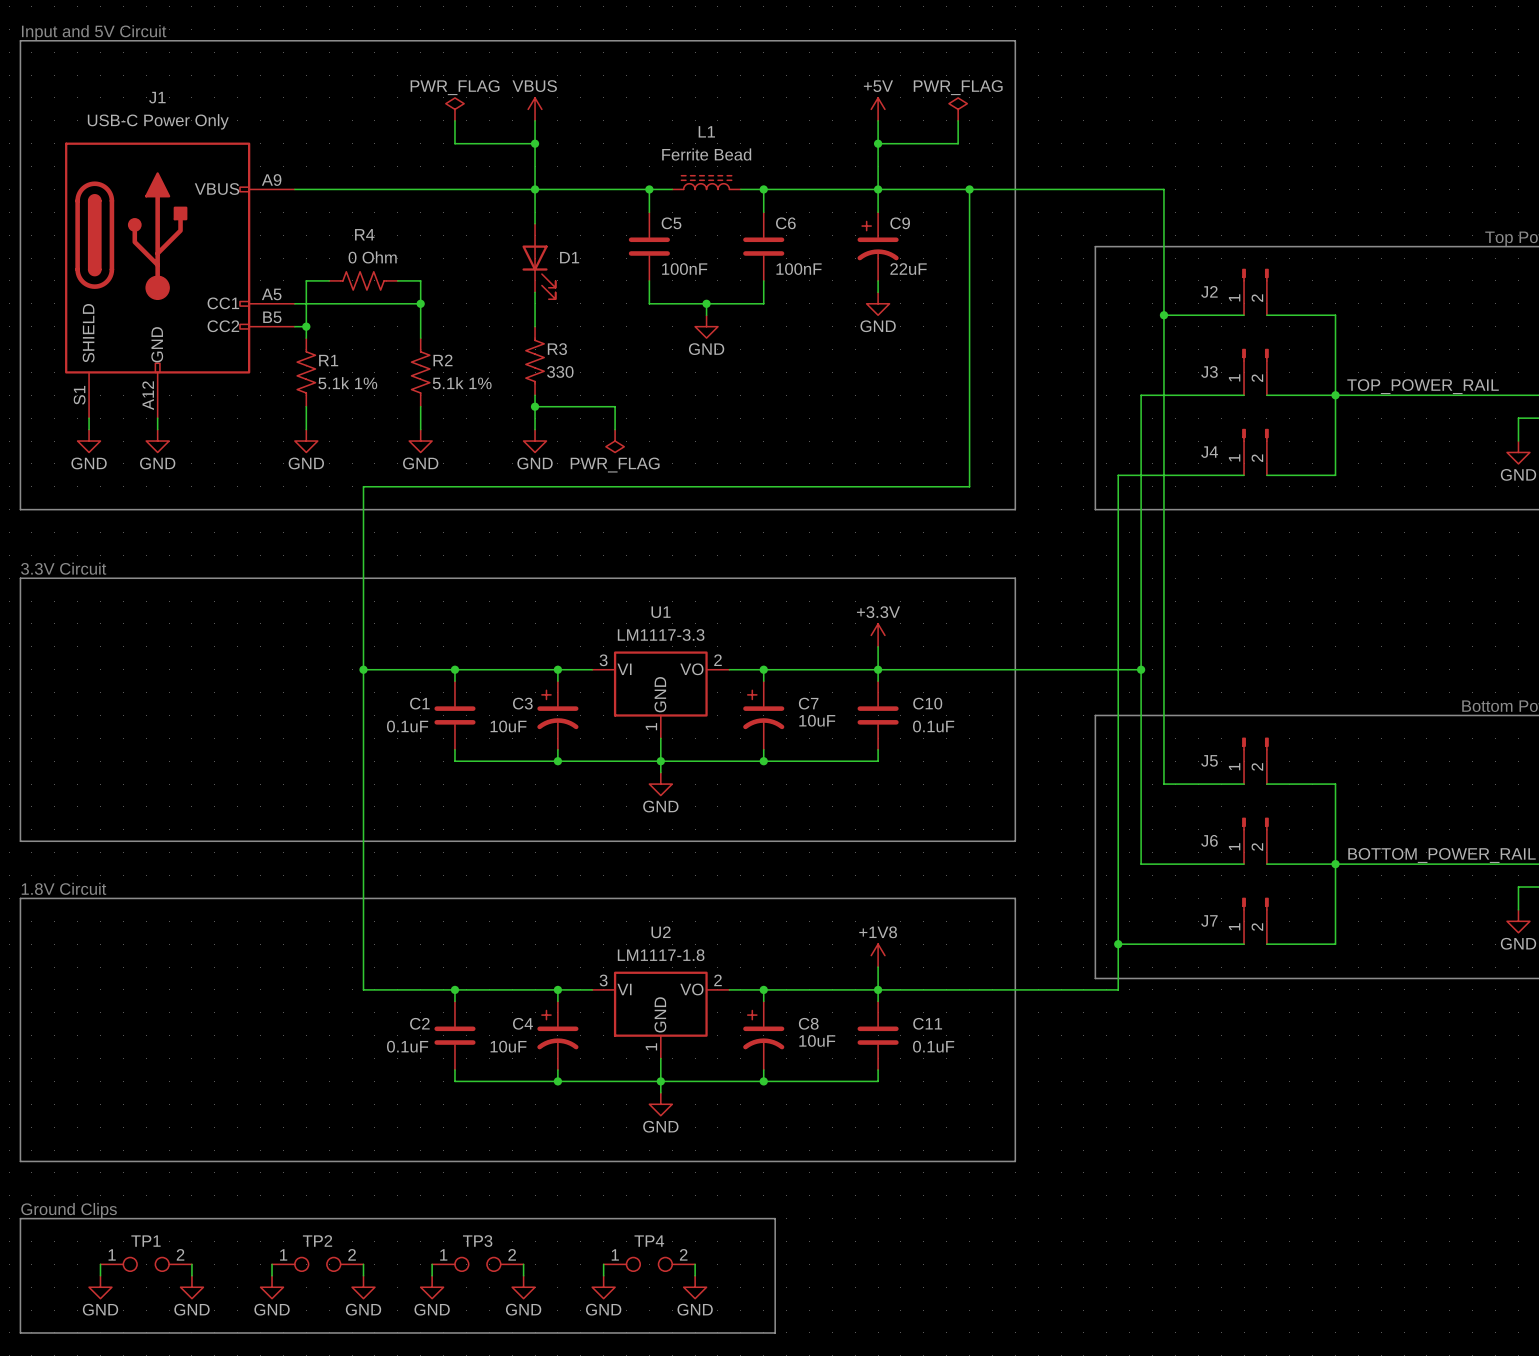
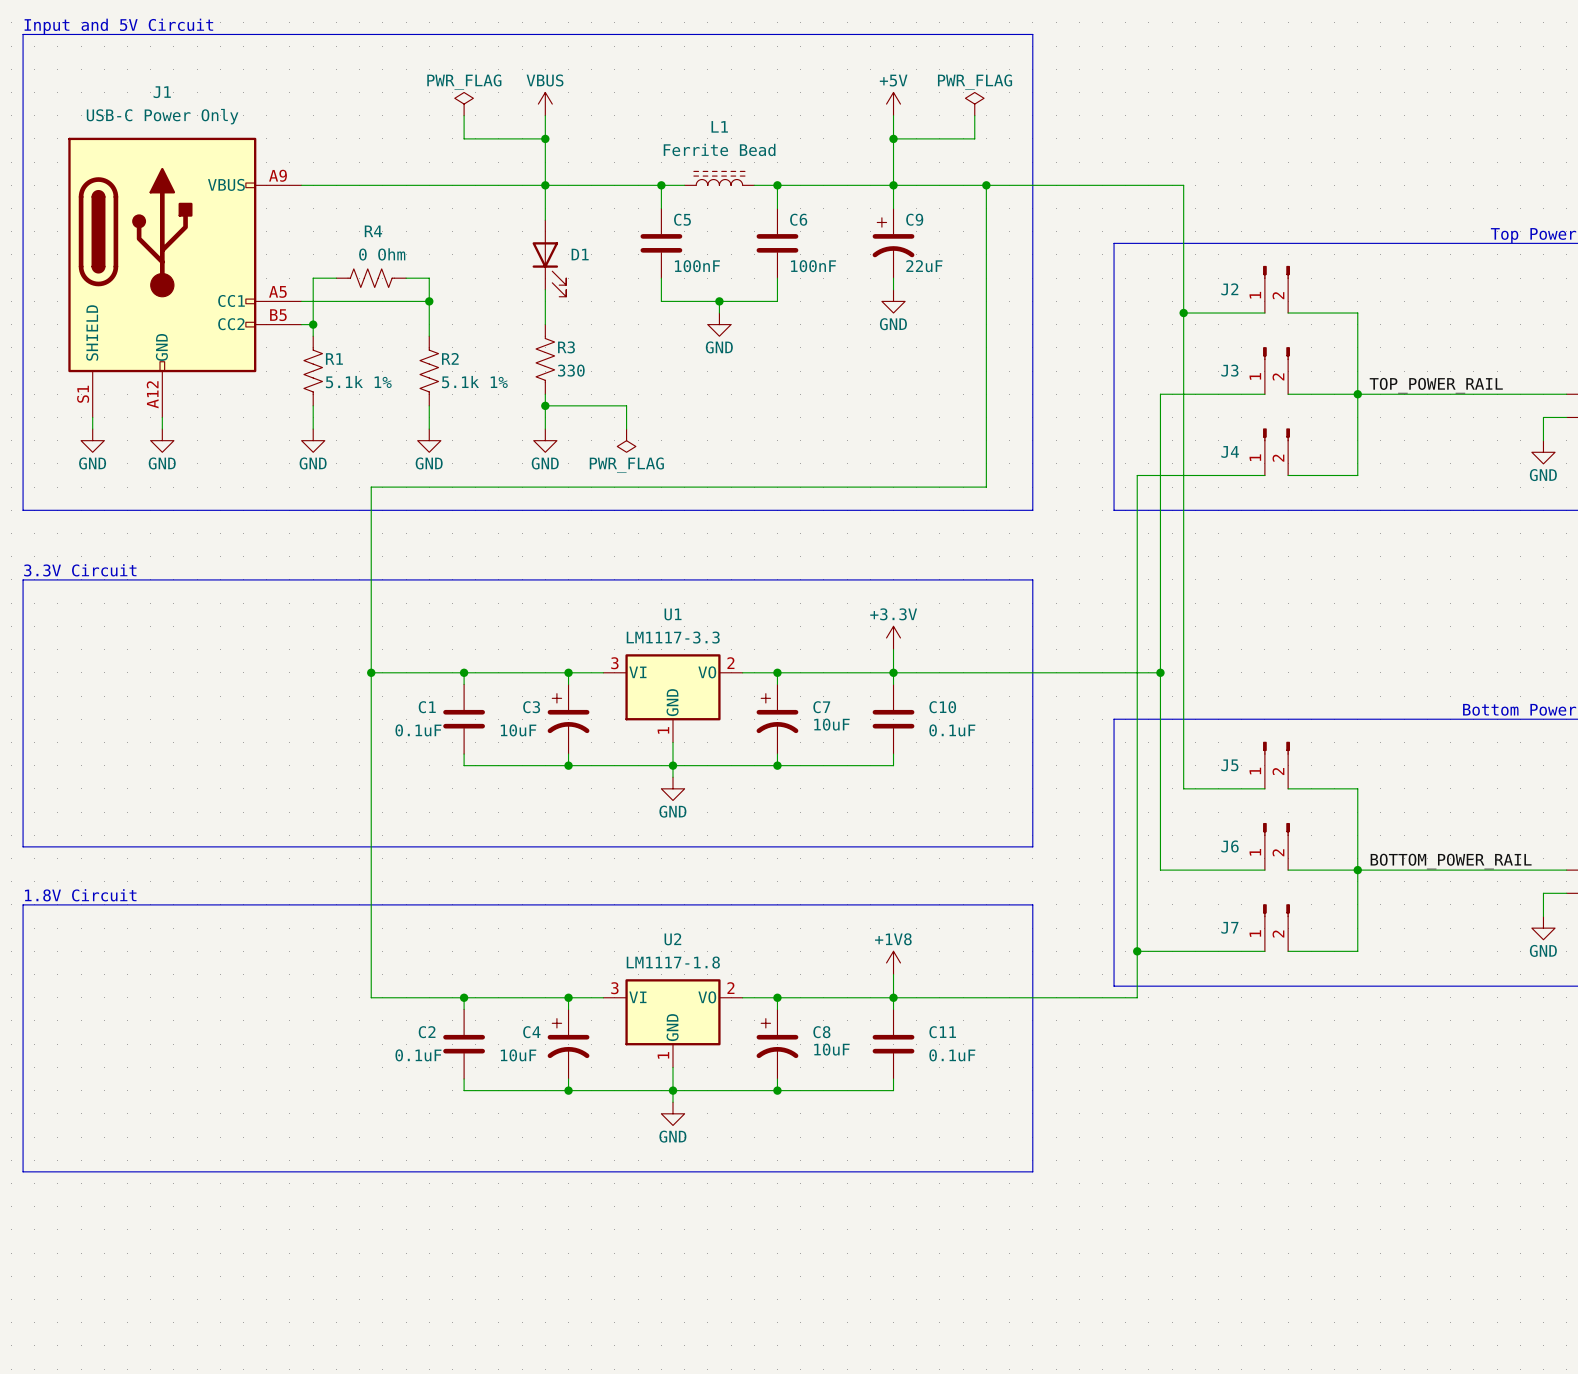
text: Ground Clips (69, 1210) -> none
line: (20, 1218) (775, 1218) (775, 1332) (20, 1332) (20, 1218) -> none
wire: (100, 1264) (100, 1275) -> none
TP1: (146, 1264) -> none
wire: (191, 1264) (191, 1275) -> none
wire: (272, 1264) (272, 1275) -> none
TP2: (317, 1264) -> none
wire: (363, 1264) (363, 1275) -> none
wire: (432, 1264) (432, 1275) -> none
TP3: (477, 1264) -> none
wire: (523, 1264) (523, 1275) -> none
wire: (603, 1264) (603, 1275) -> none
TP4: (649, 1264) -> none
wire: (695, 1264) (695, 1275) -> none
power symbol: GND (100, 1287) -> none
power symbol: GND (191, 1287) -> none
power symbol: GND (272, 1287) -> none
power symbol: GND (363, 1287) -> none
power symbol: GND (432, 1287) -> none
power symbol: GND (523, 1287) -> none
power symbol: GND (603, 1287) -> none
power symbol: GND (695, 1287) -> none

